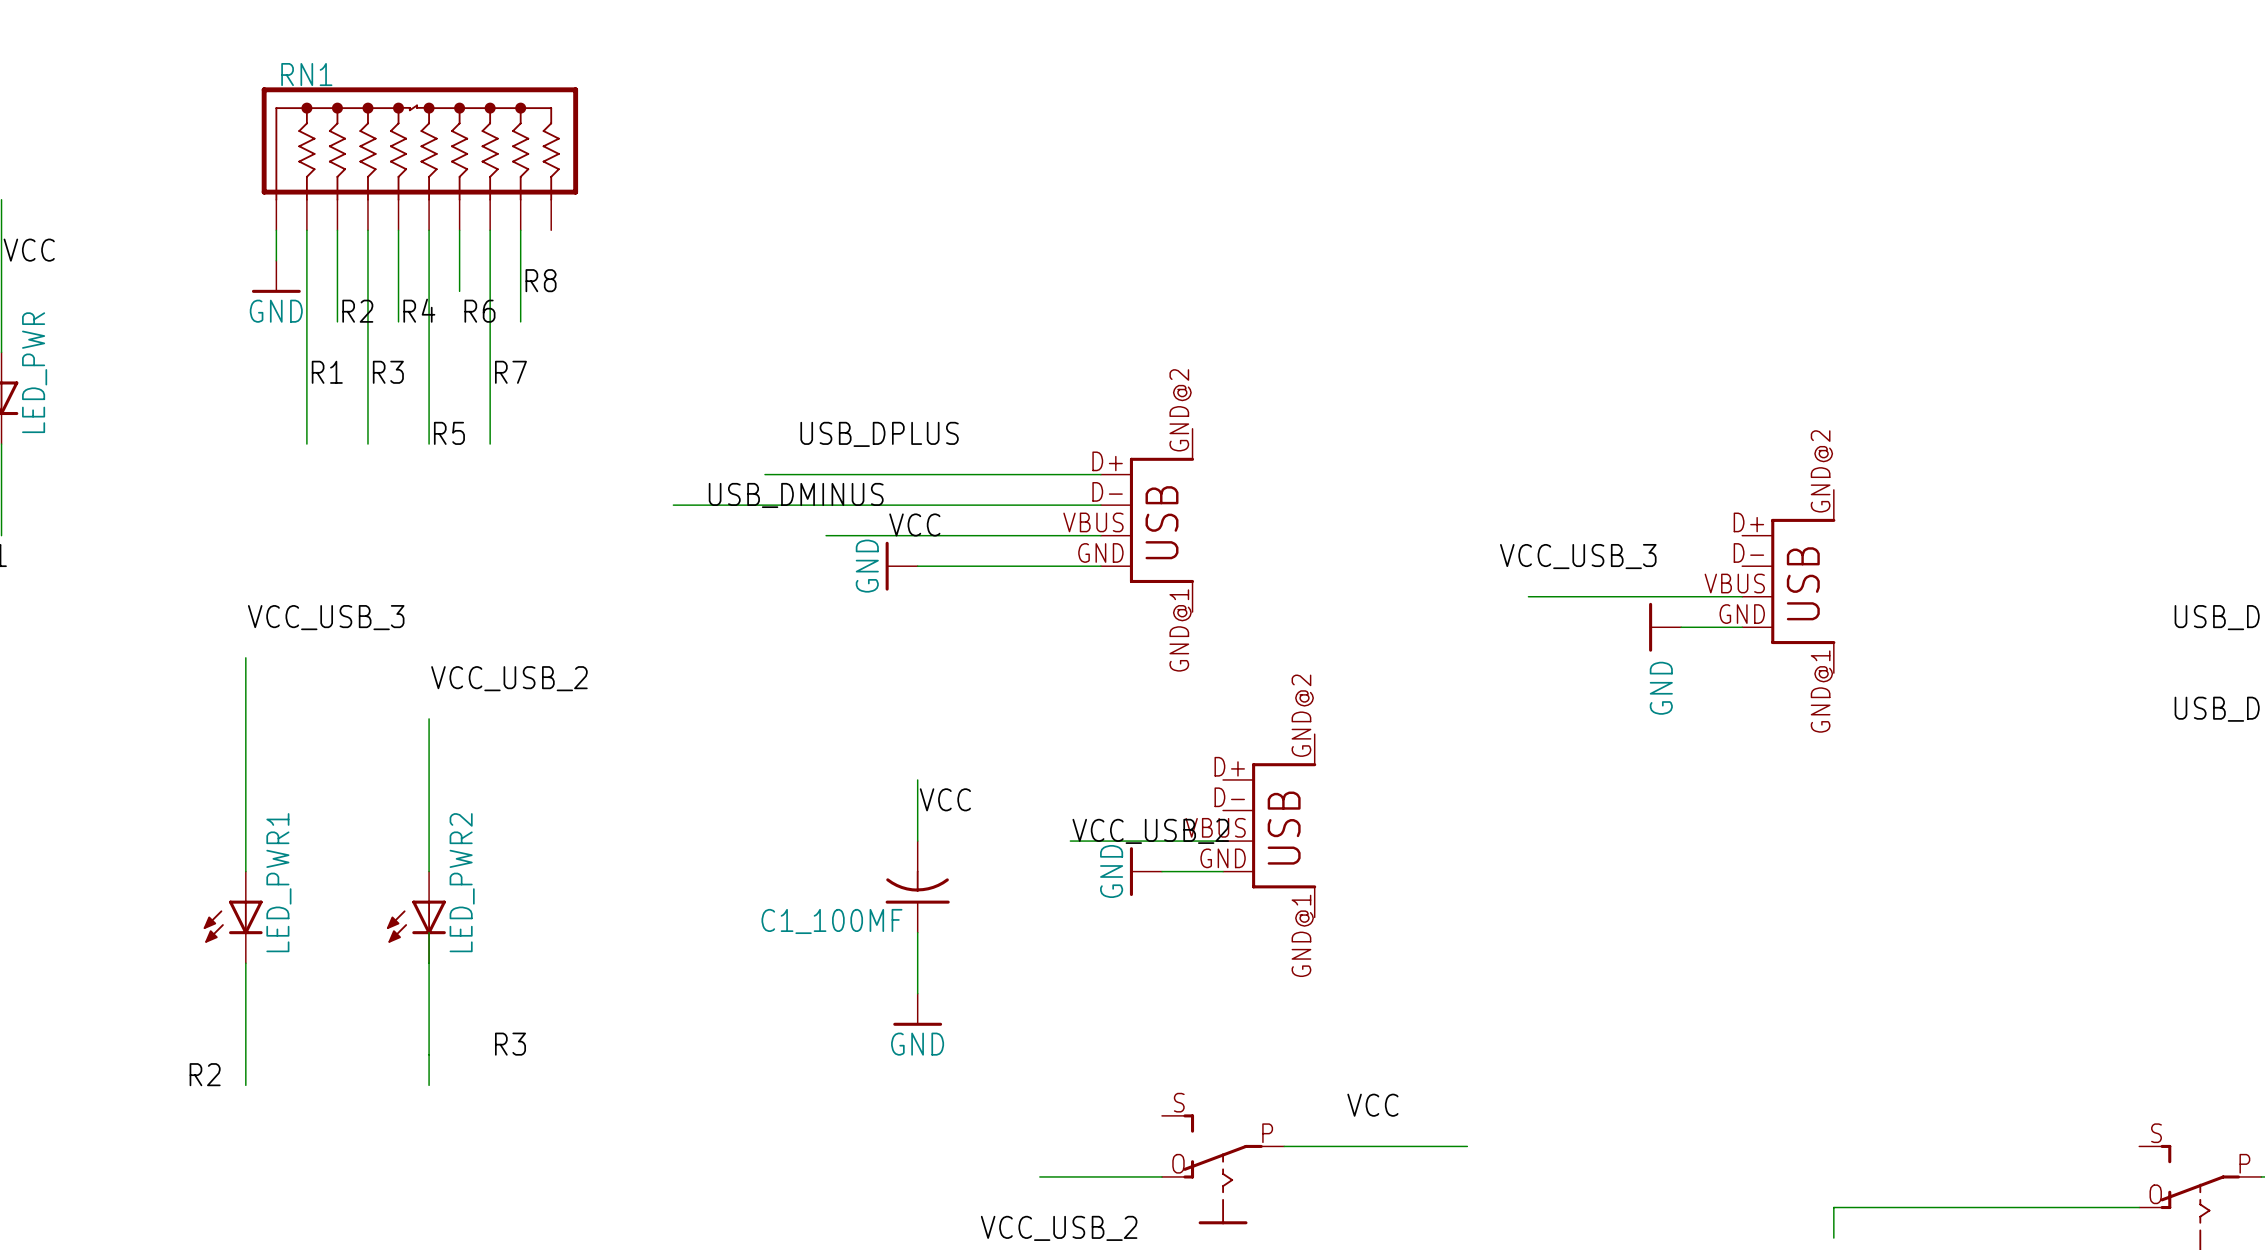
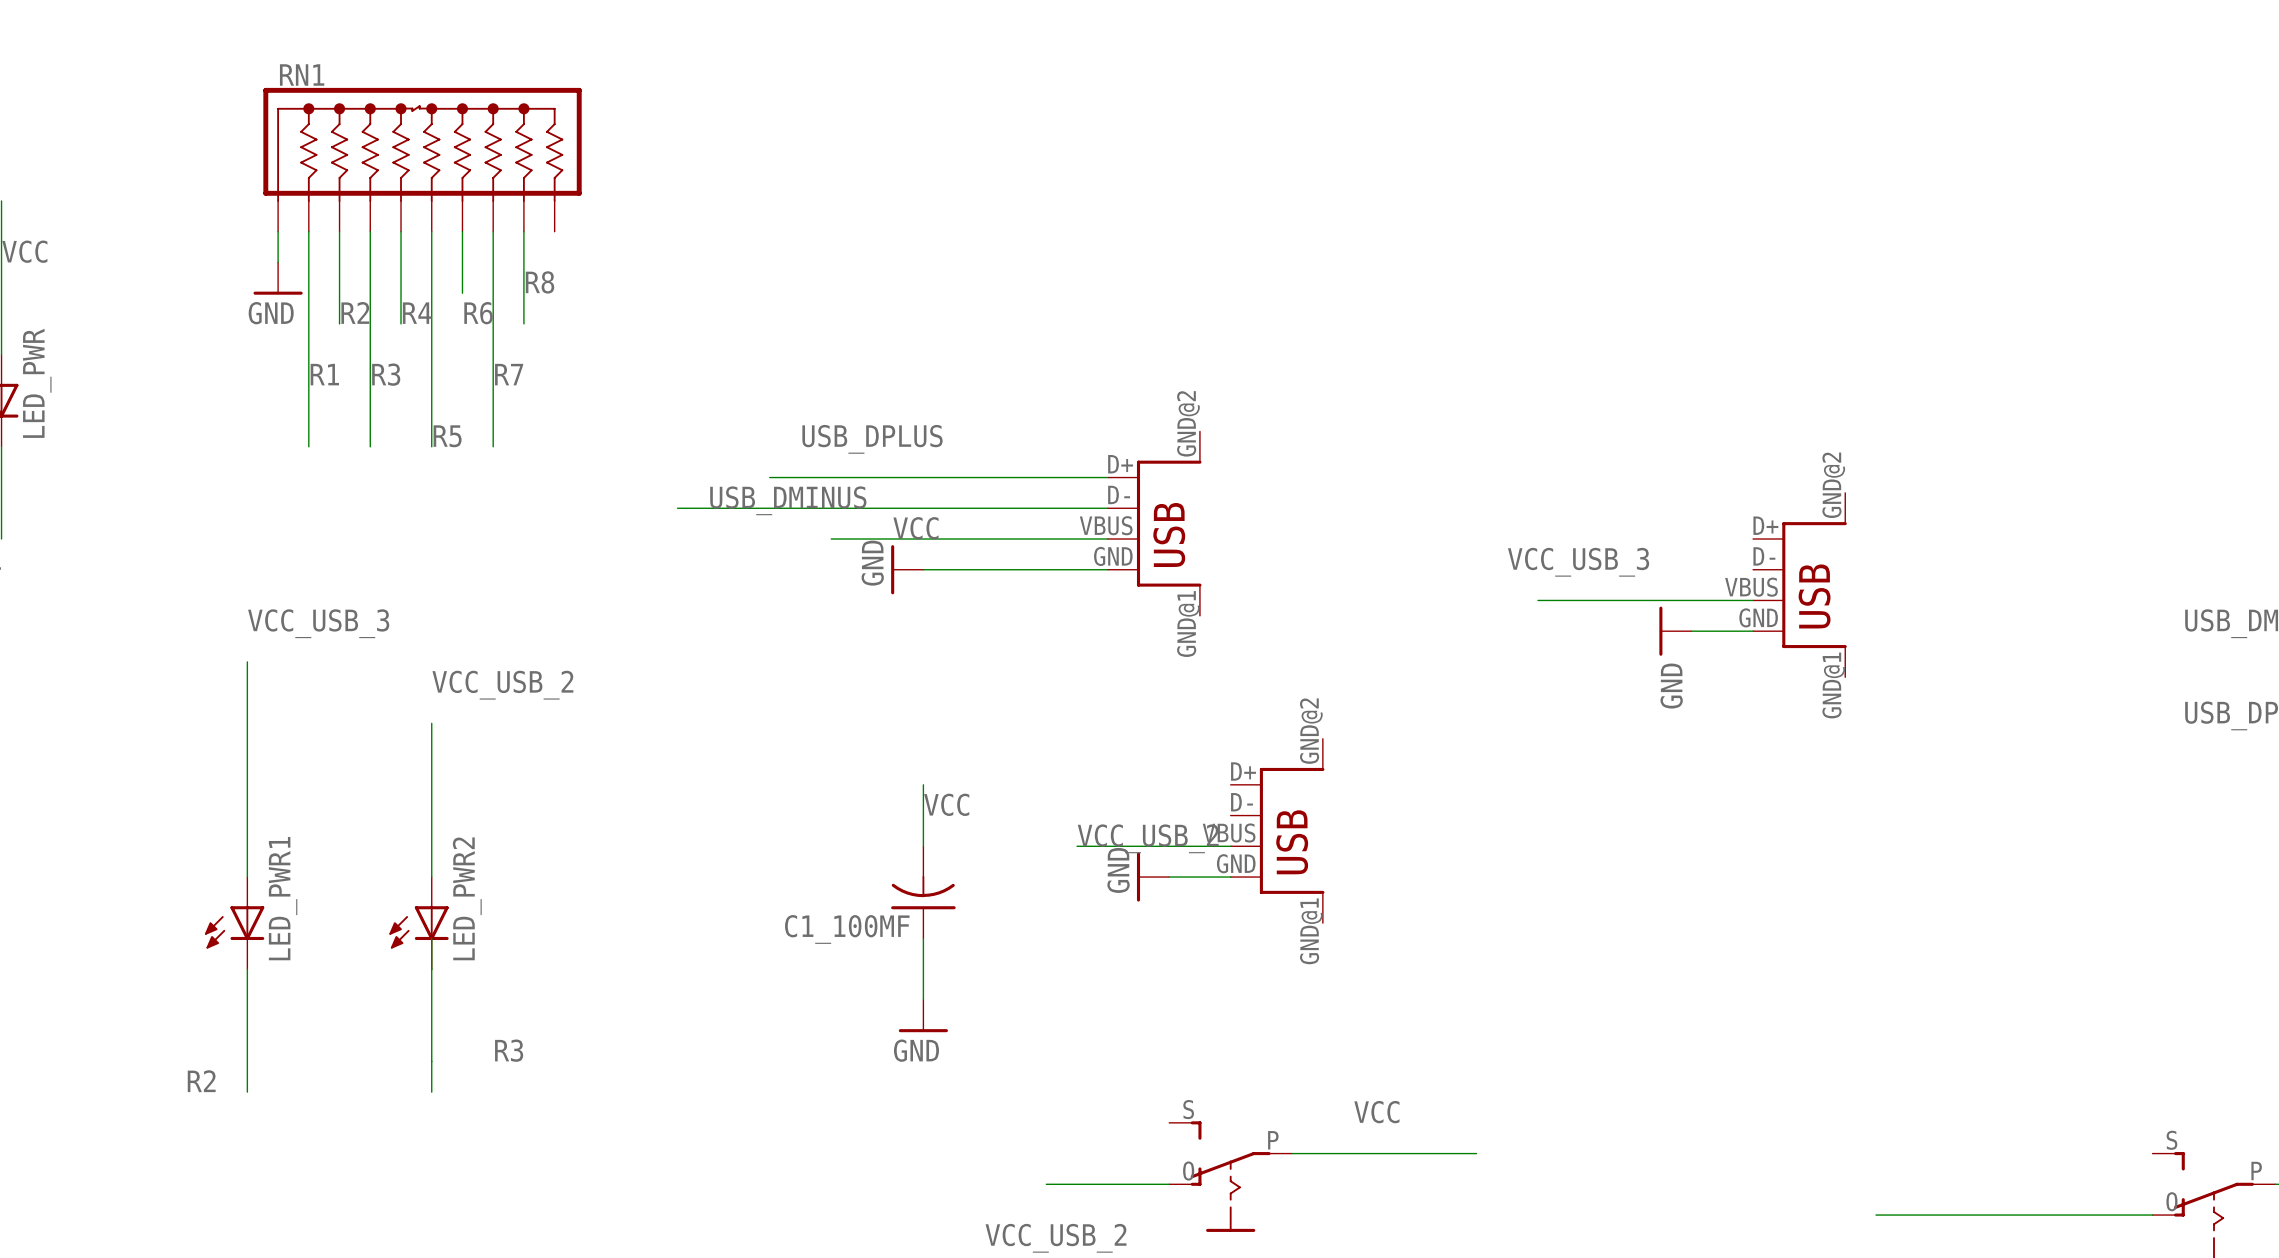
wire: (1864, 1207) (1833, 1207) (1833, 1238) -> none

